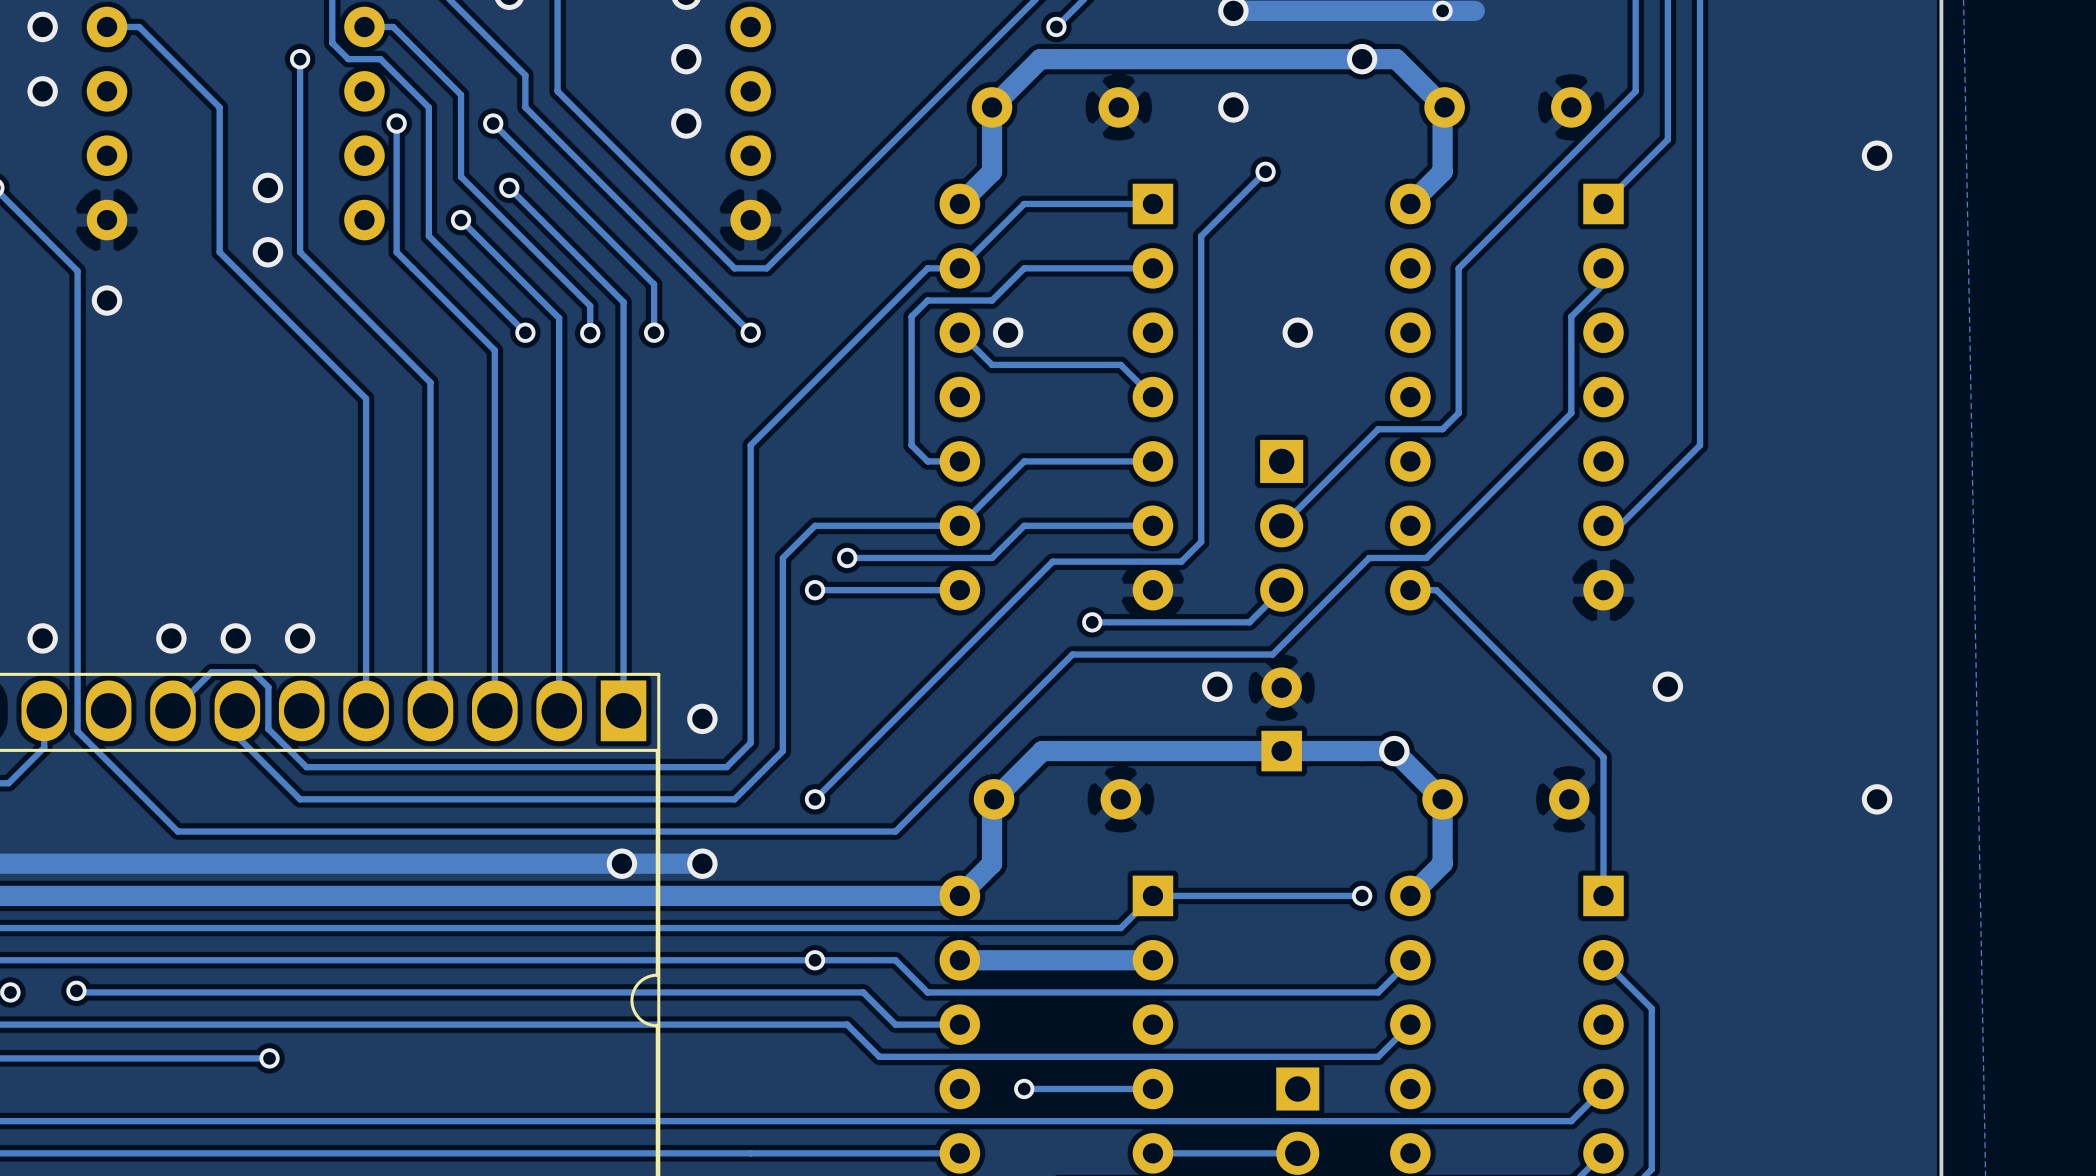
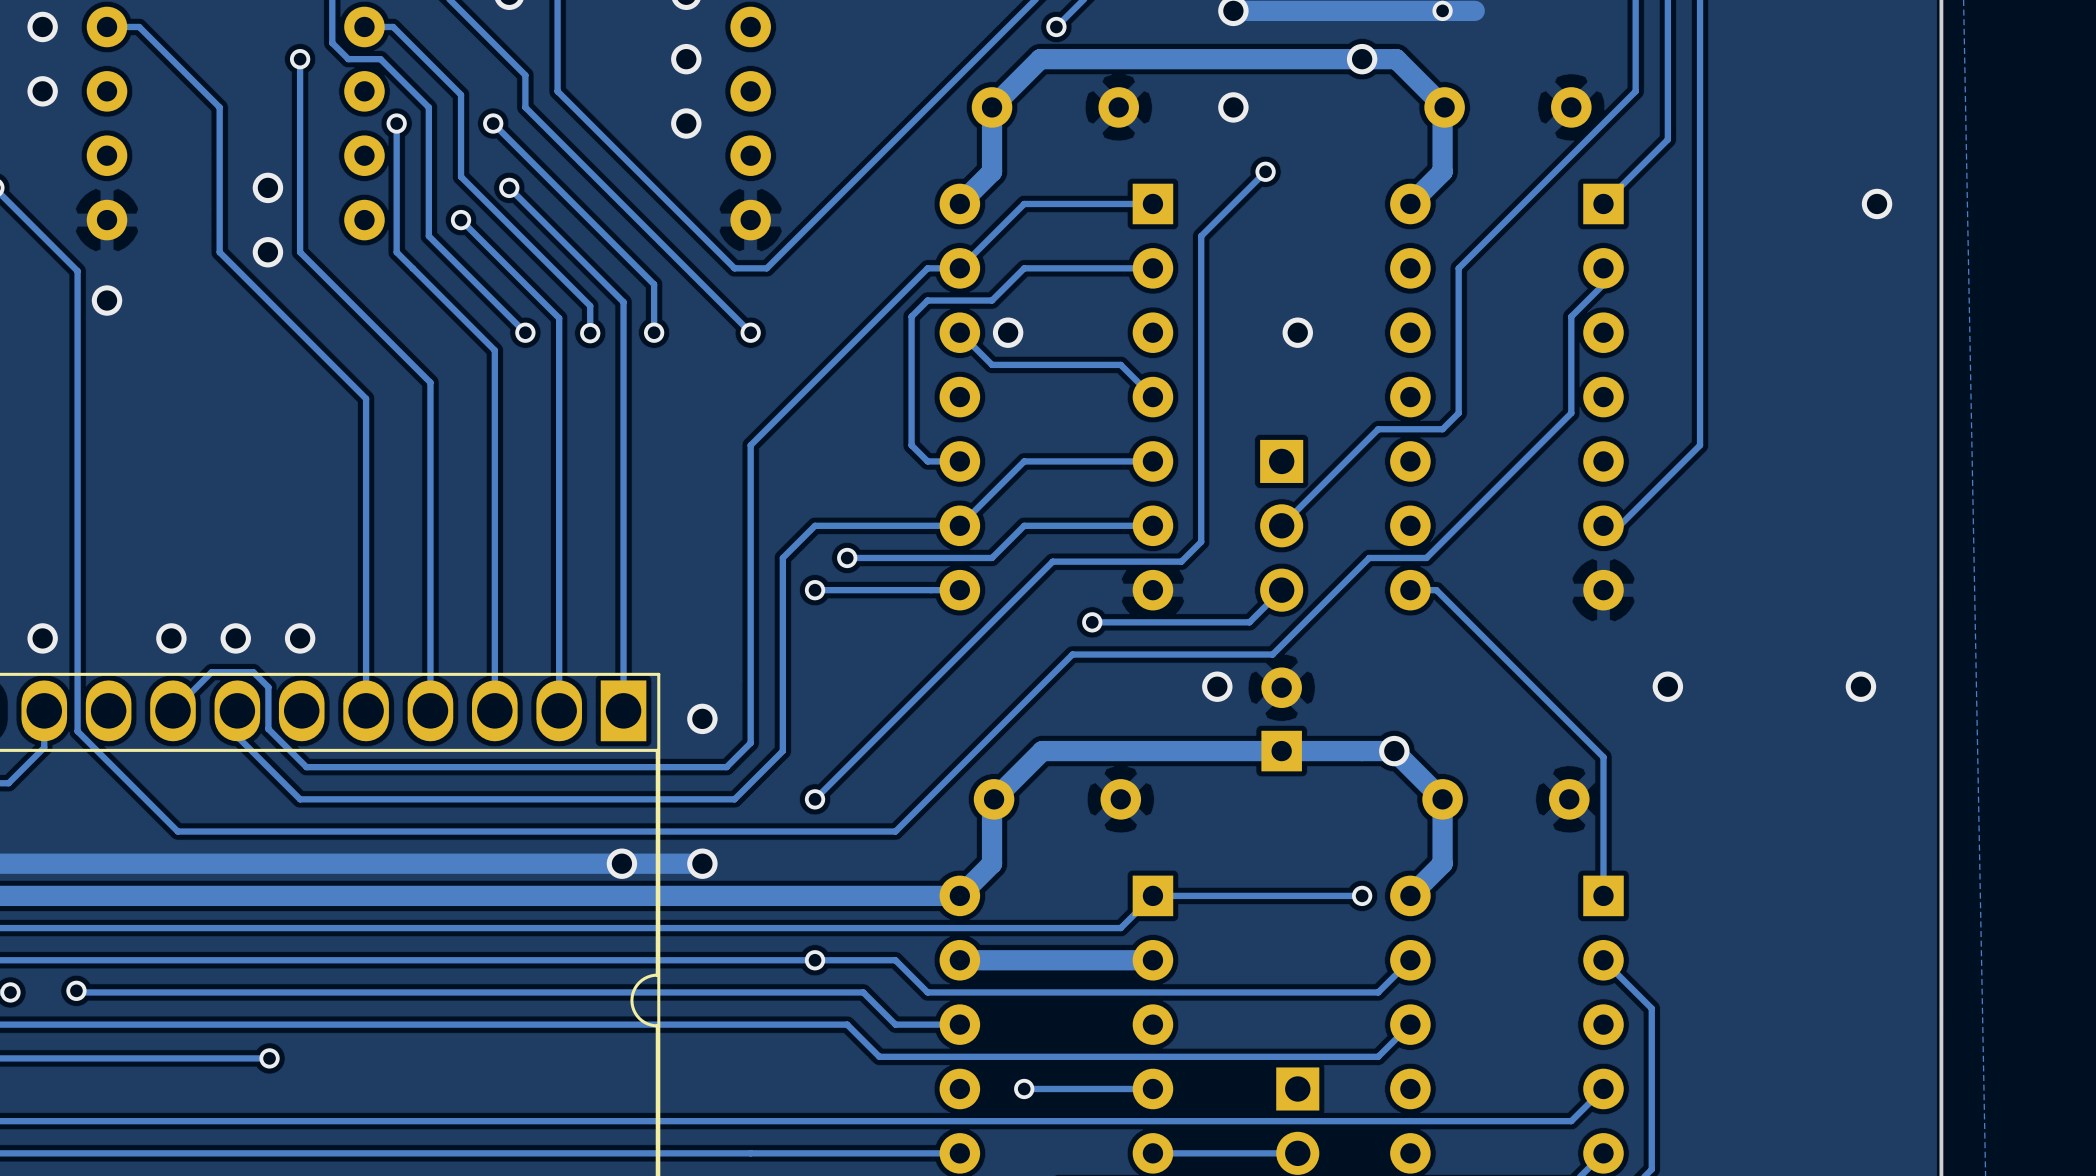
via position: (1877, 155) -> (1877, 203)
via position: (1877, 799) -> (1860, 686)

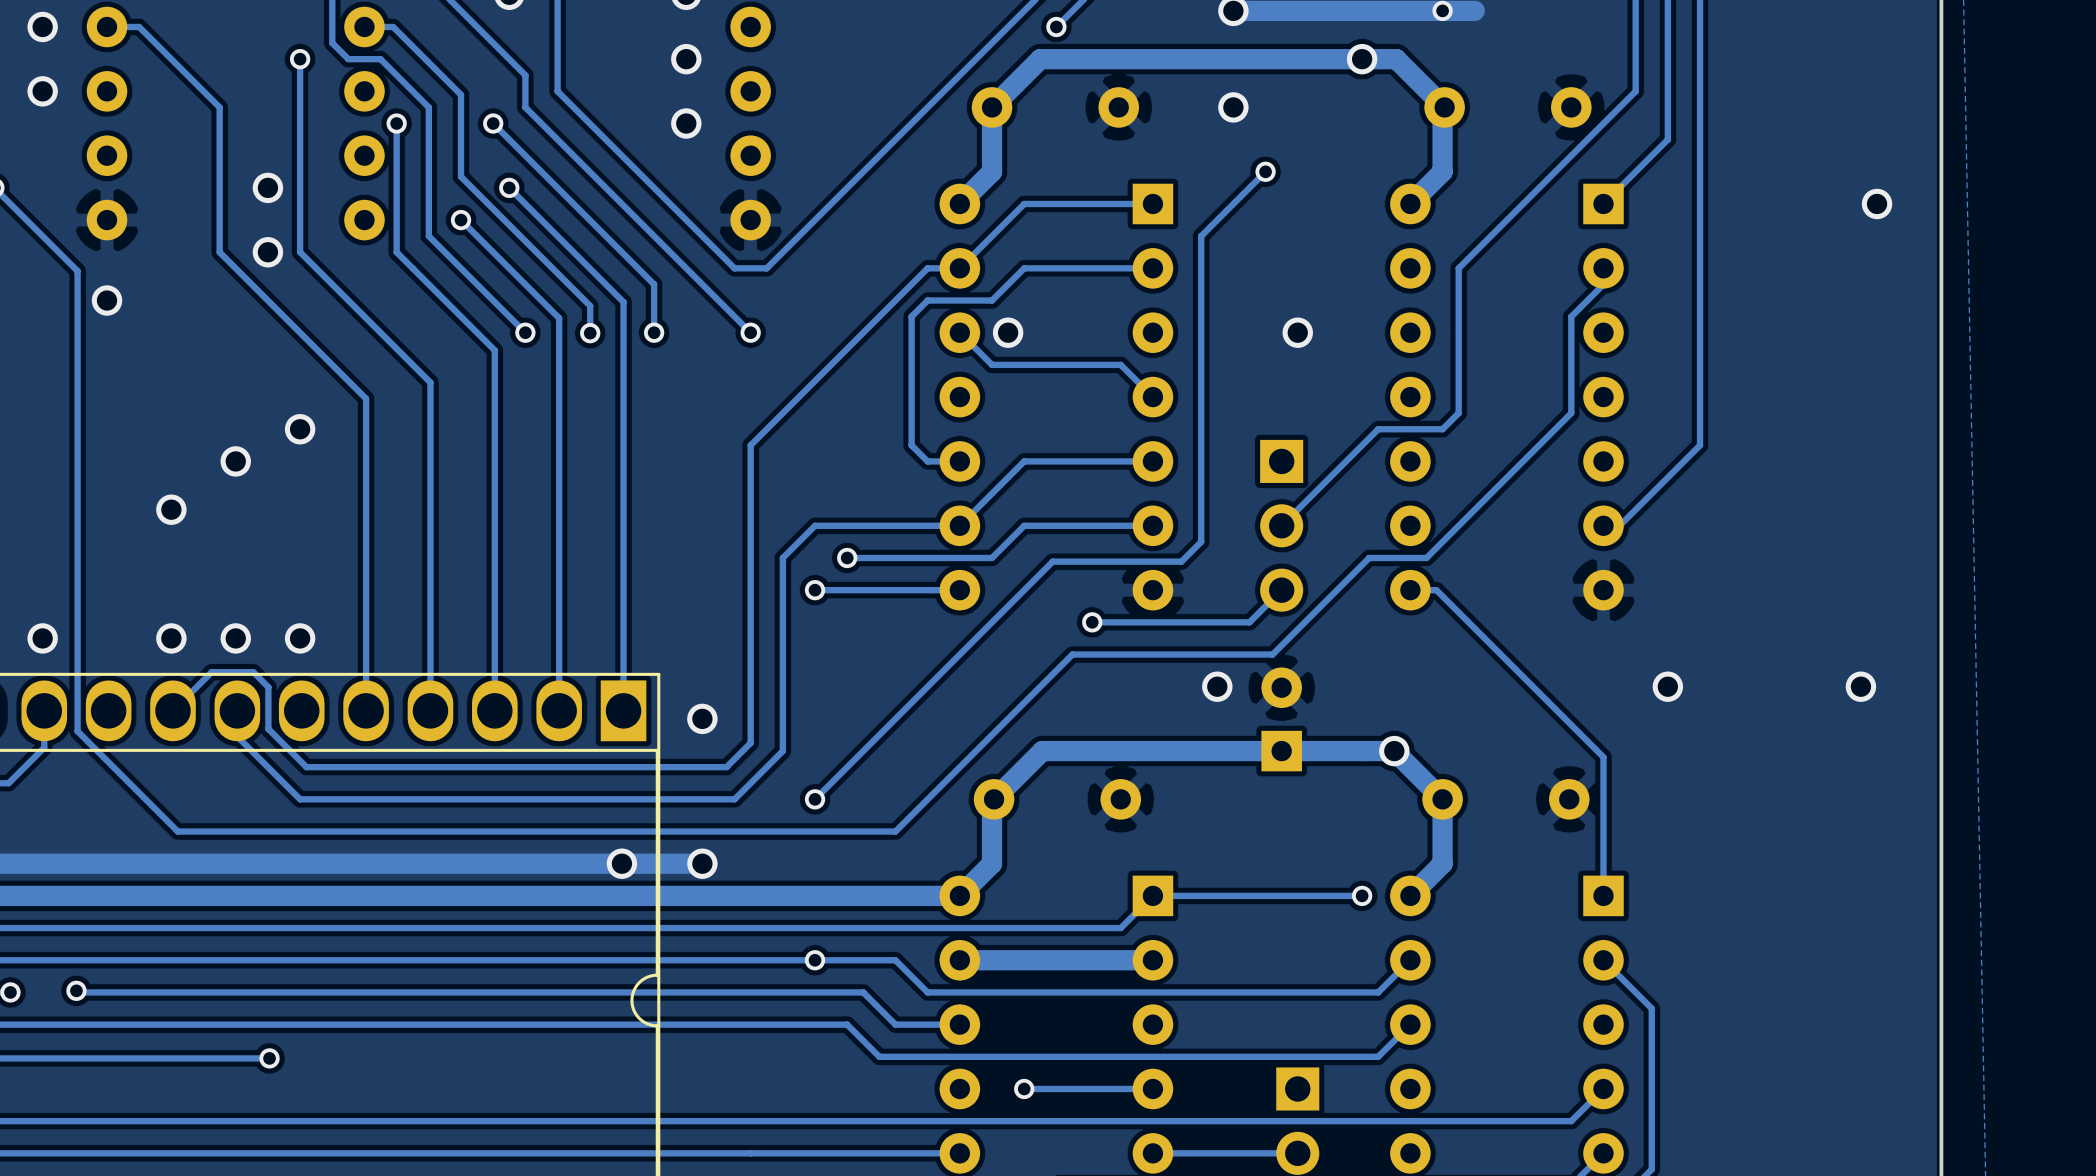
via: none -> (300, 429)
via: none -> (235, 461)
via: none -> (171, 509)

